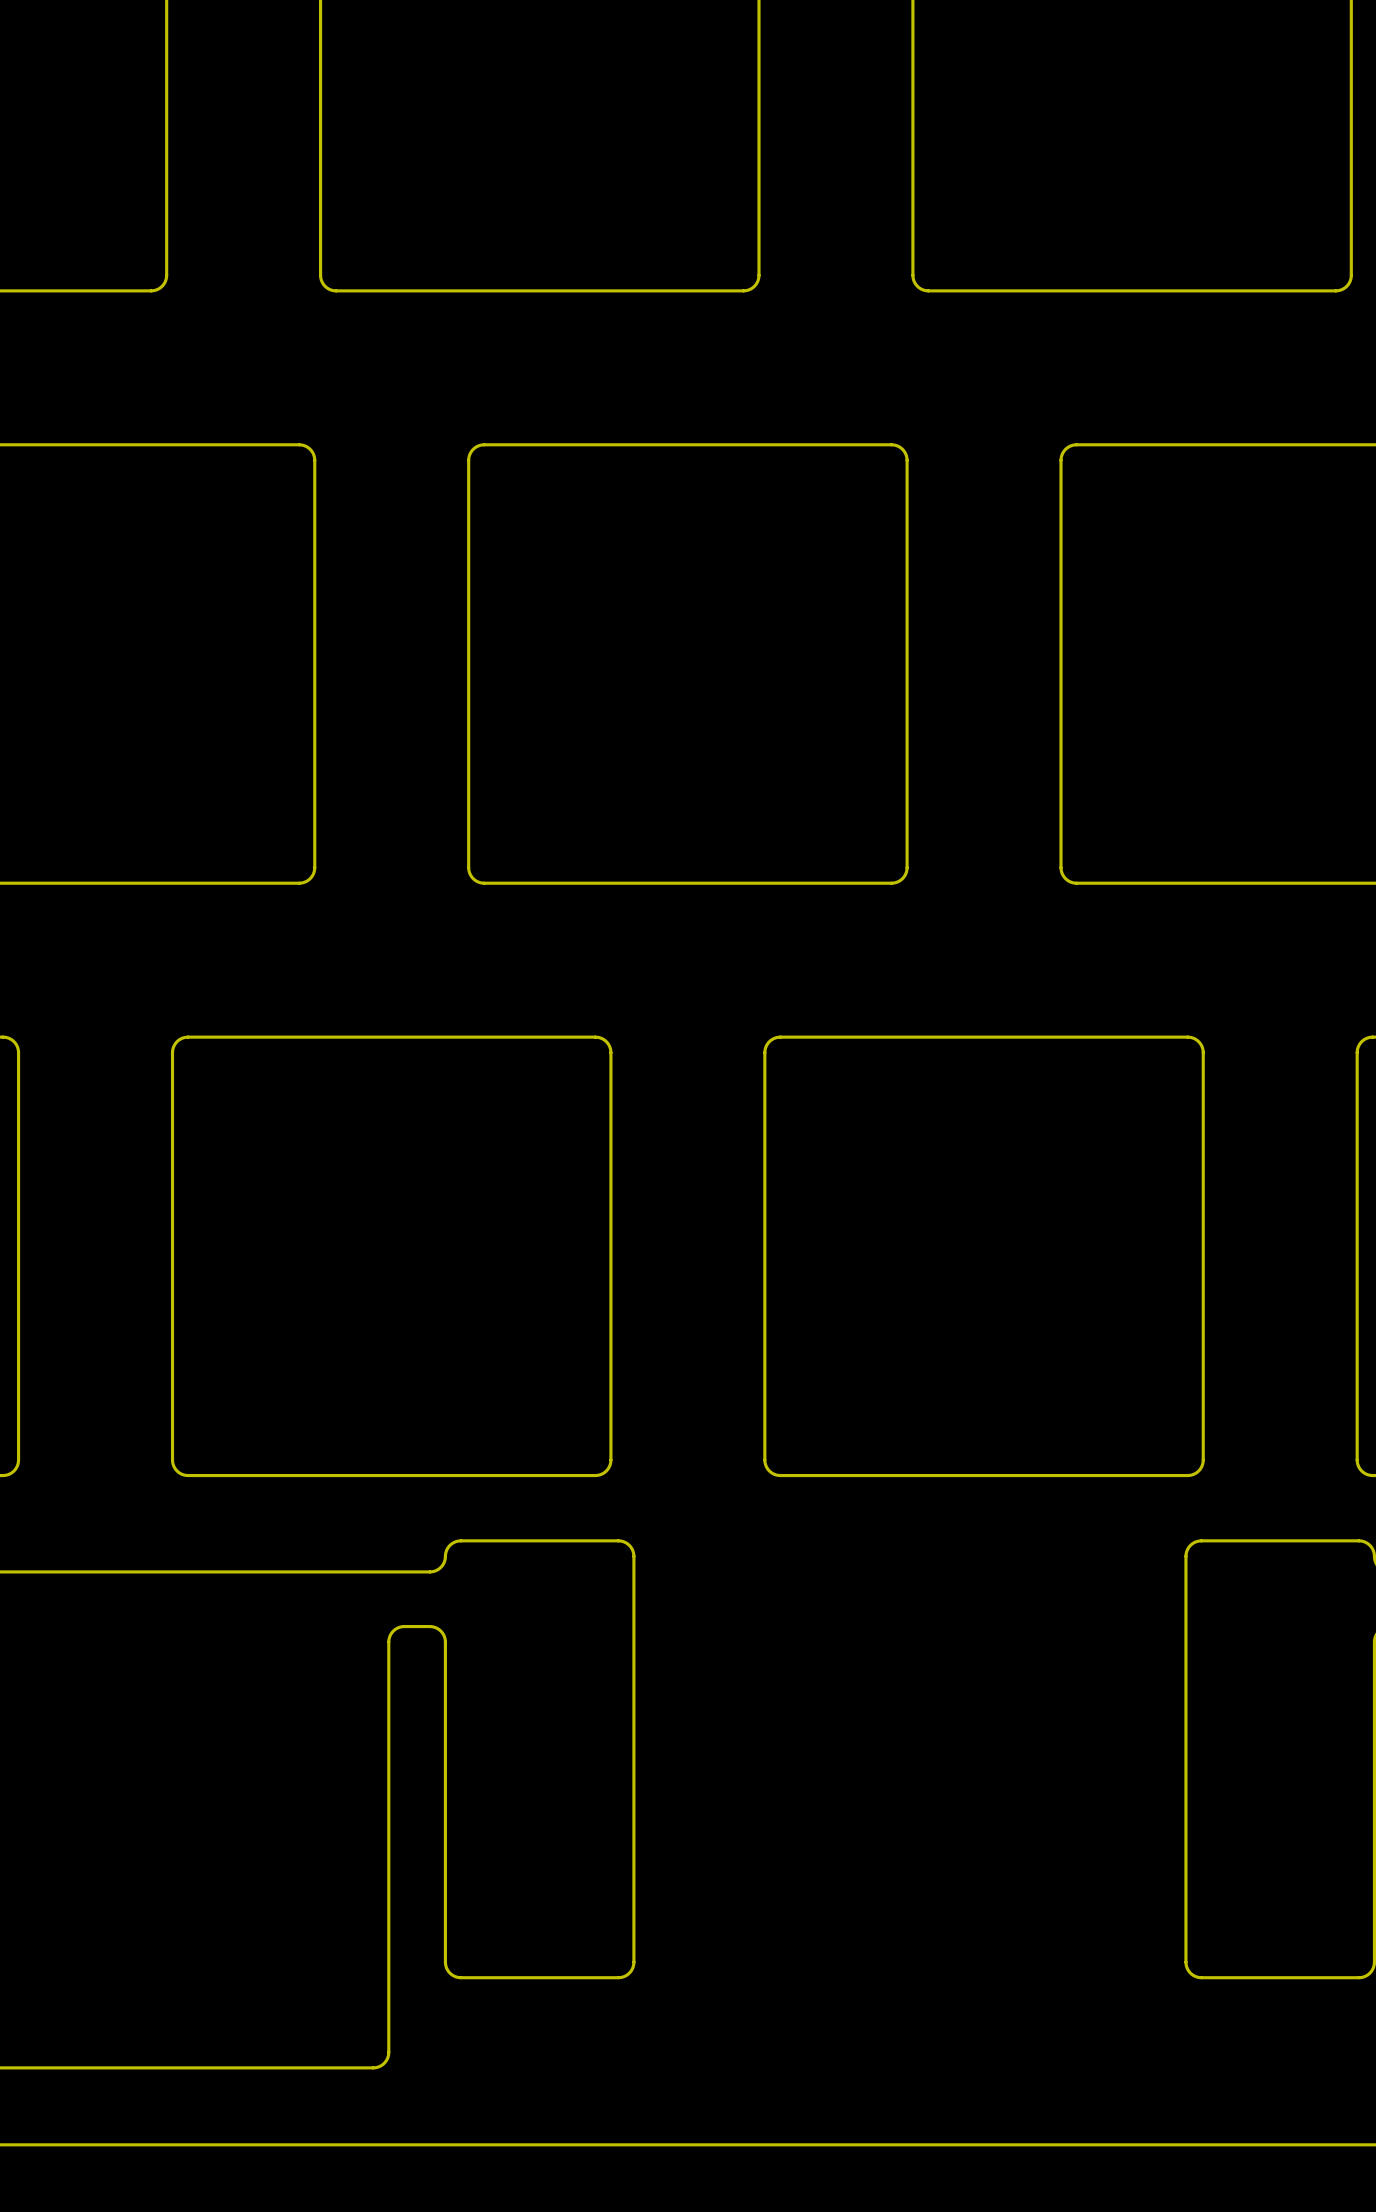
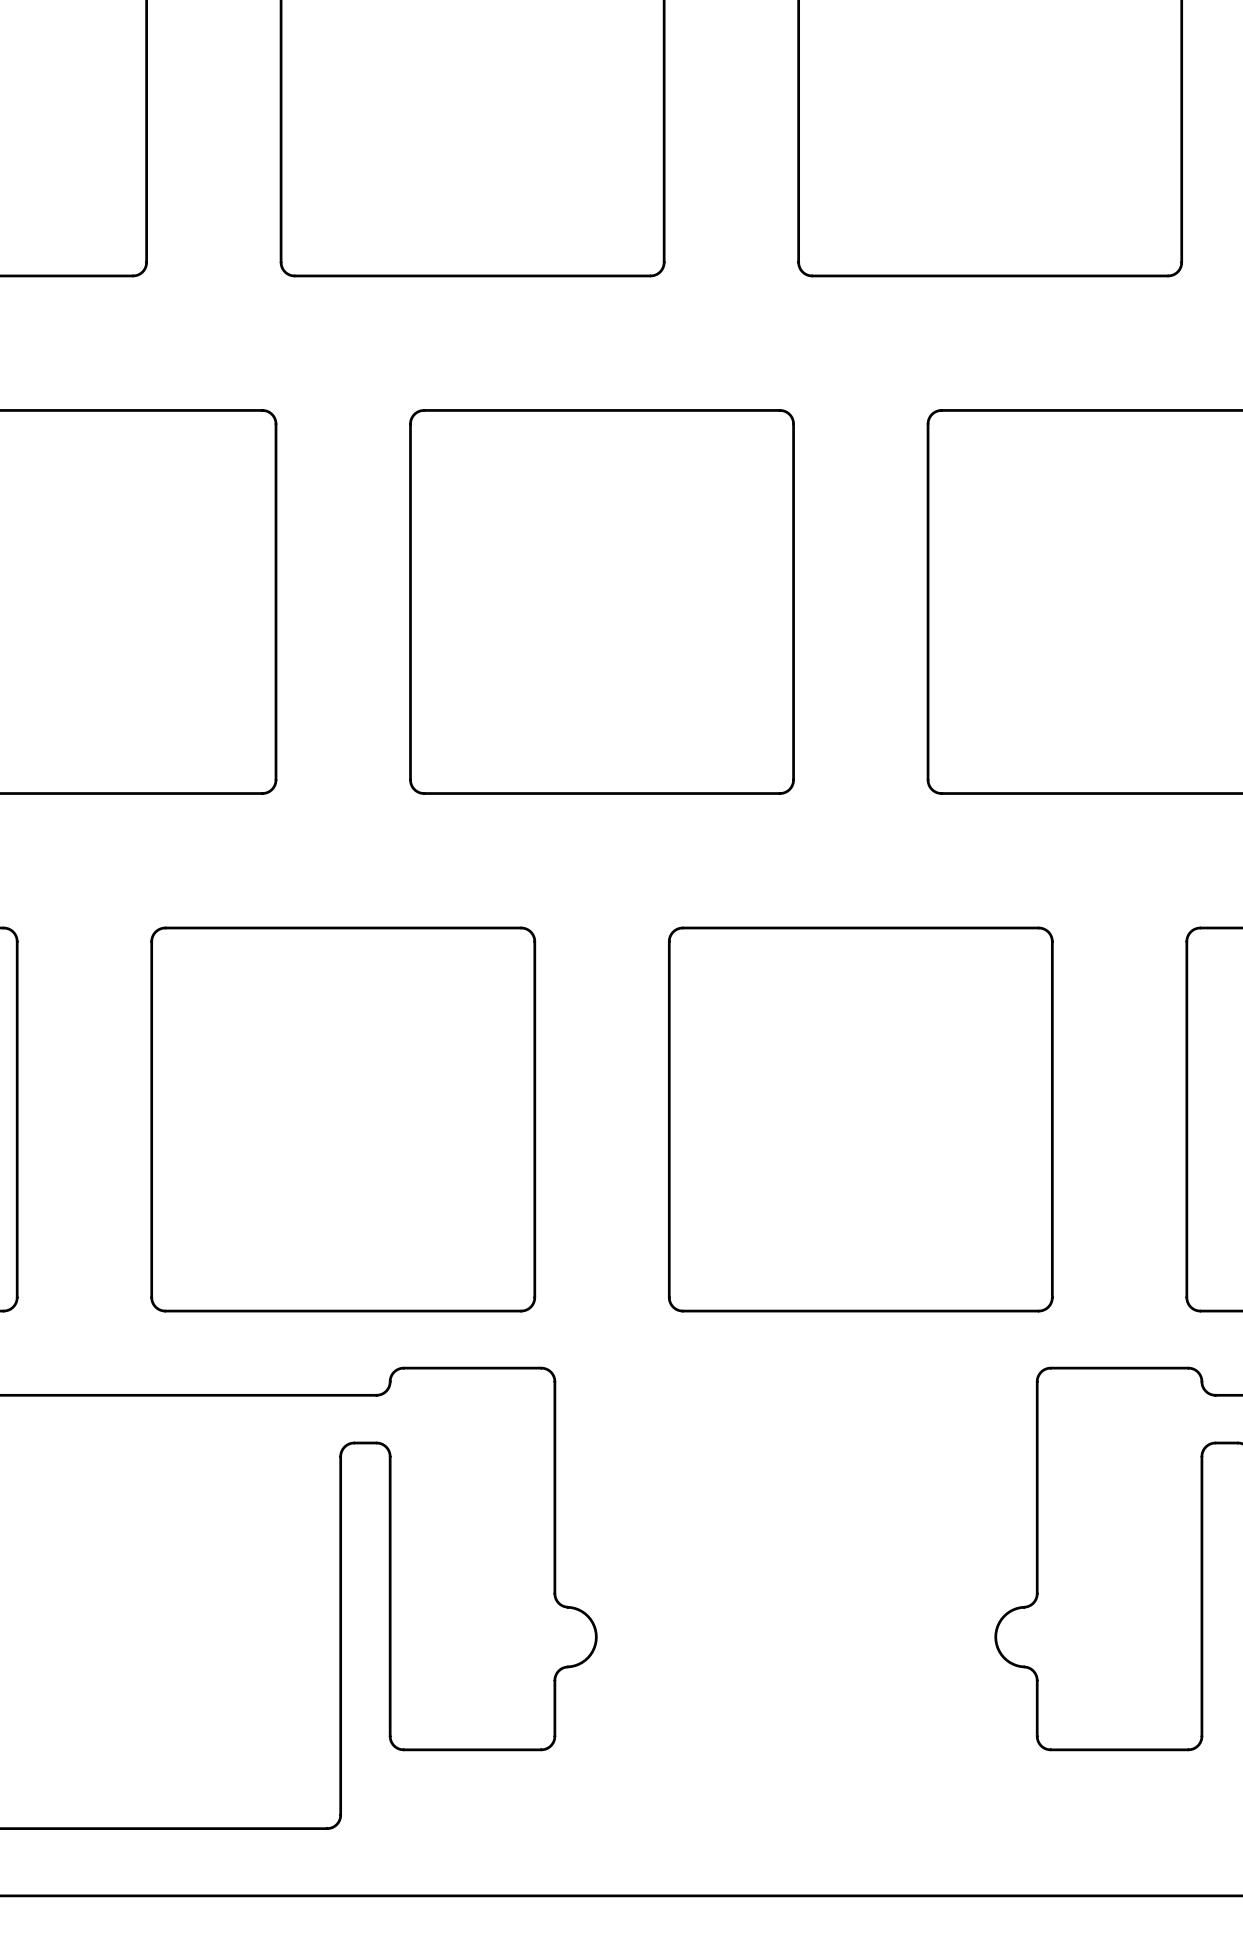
board edge: (633, 1798) (633, 1898) -> (554, 1593) (556, 1600) (561, 1605) (578, 1609) (588, 1616) (594, 1625) (596, 1637) (594, 1648) (588, 1657) (578, 1664) (561, 1668) (556, 1673) (554, 1680)
board edge: (1185, 1798) (1185, 1898) -> (1037, 1593) (1035, 1600) (1030, 1605) (1013, 1609) (1004, 1616) (997, 1625) (995, 1637) (997, 1648) (1004, 1657) (1013, 1664) (1030, 1668) (1035, 1673) (1037, 1680)

